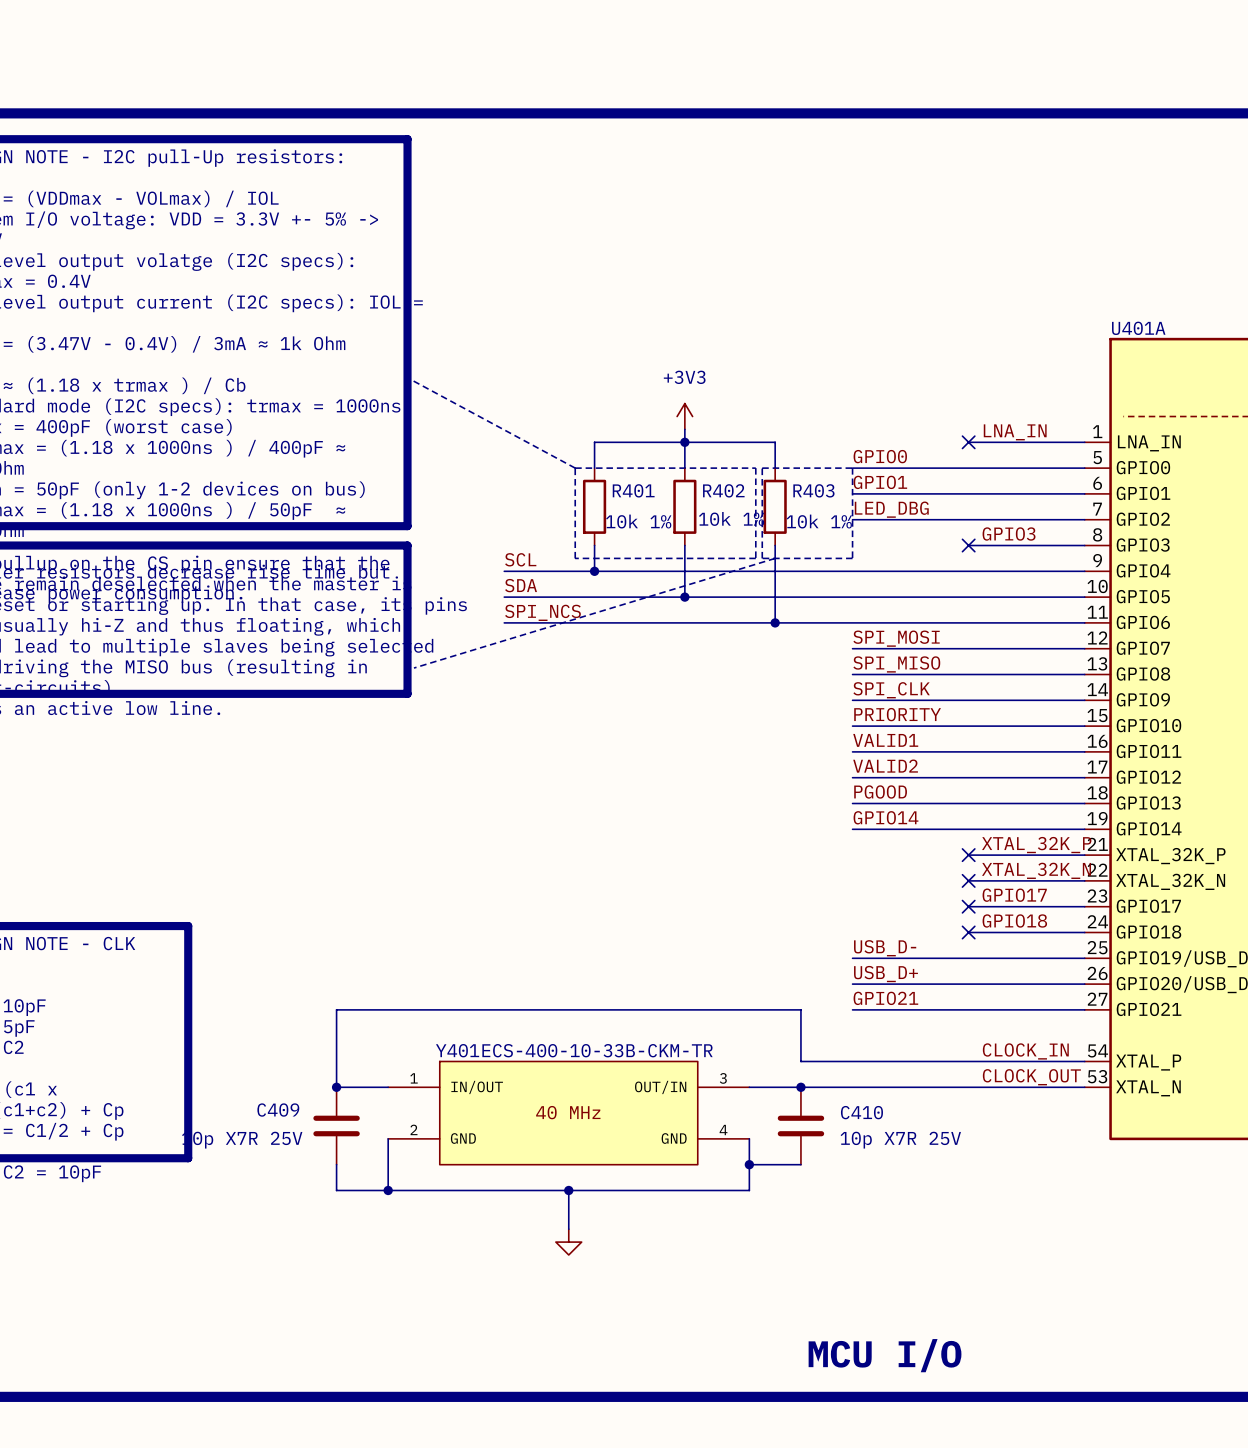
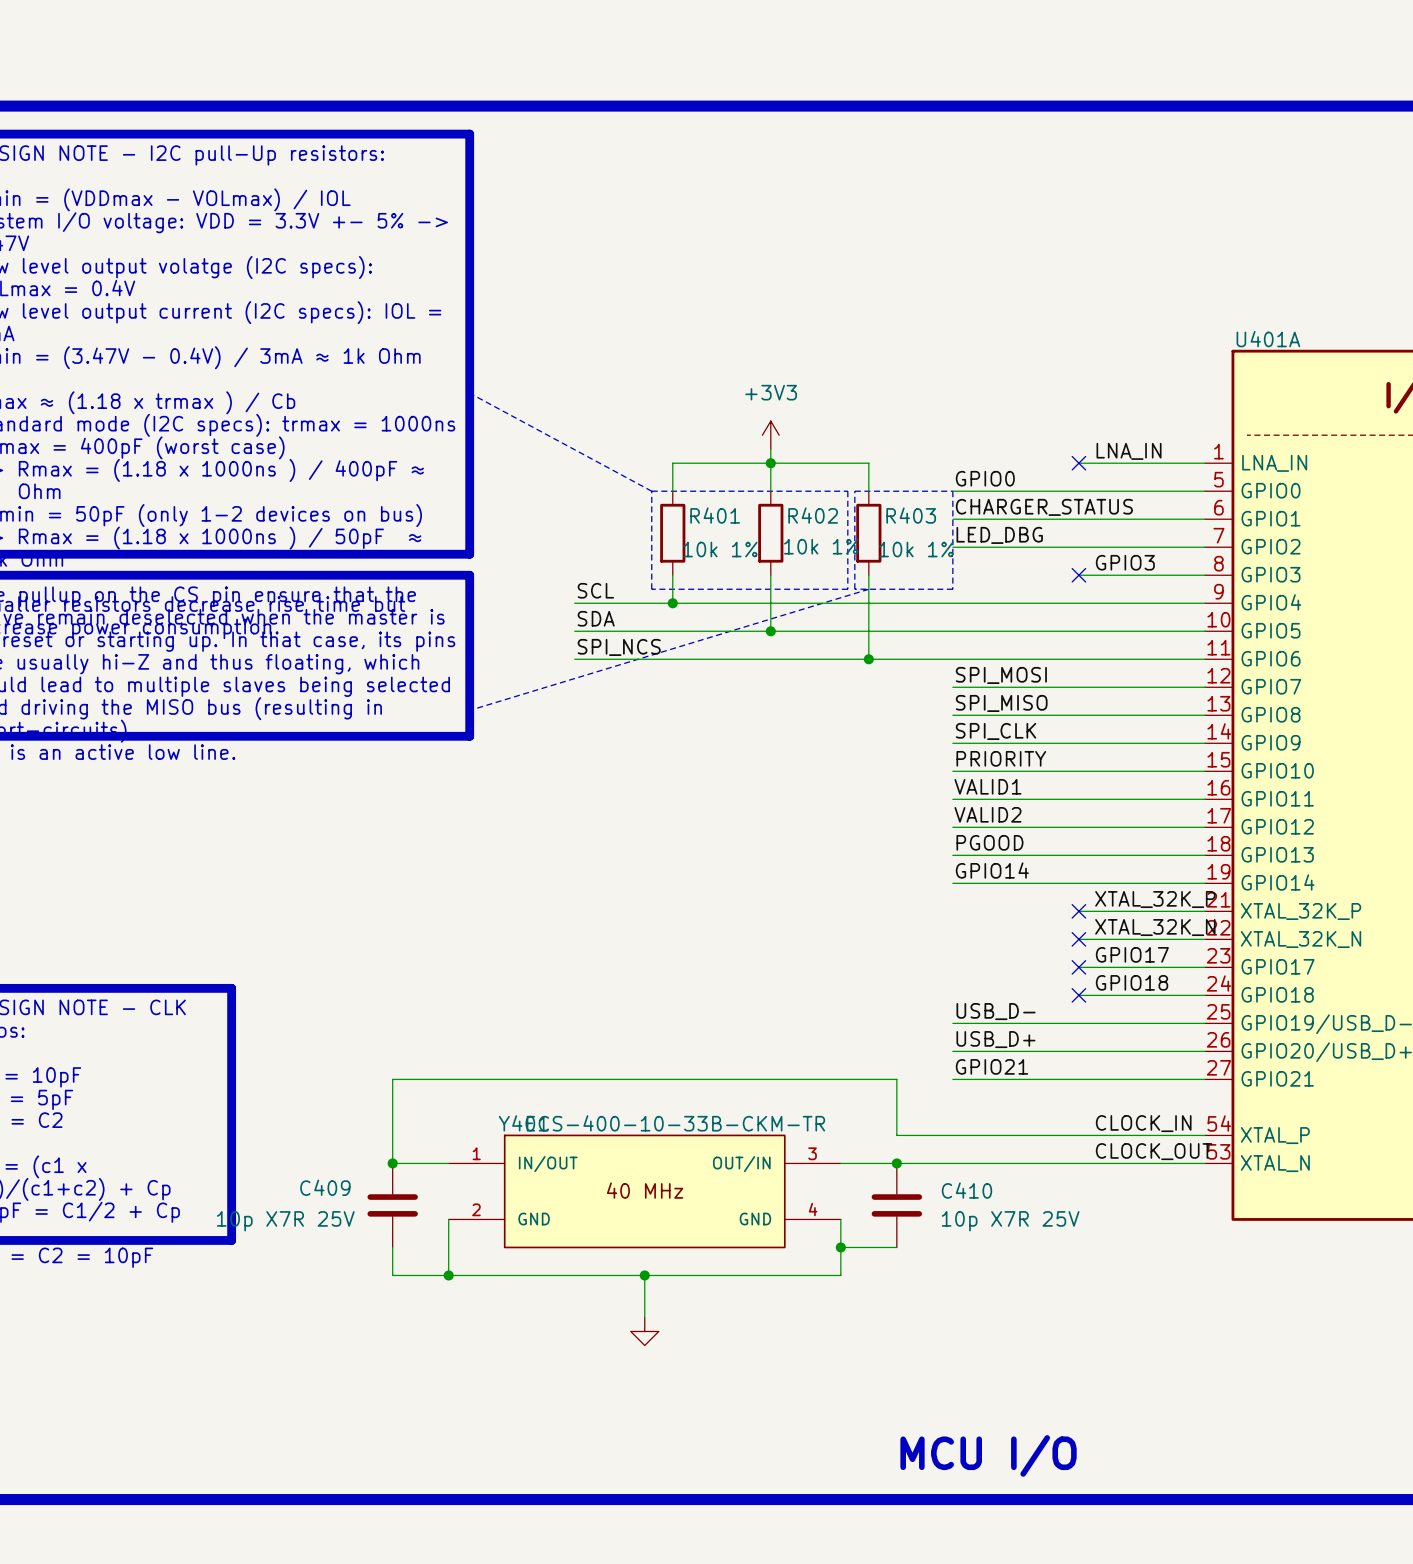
label: GPIO1 (880, 482) -> CHARGER_STATUS (1044, 507)

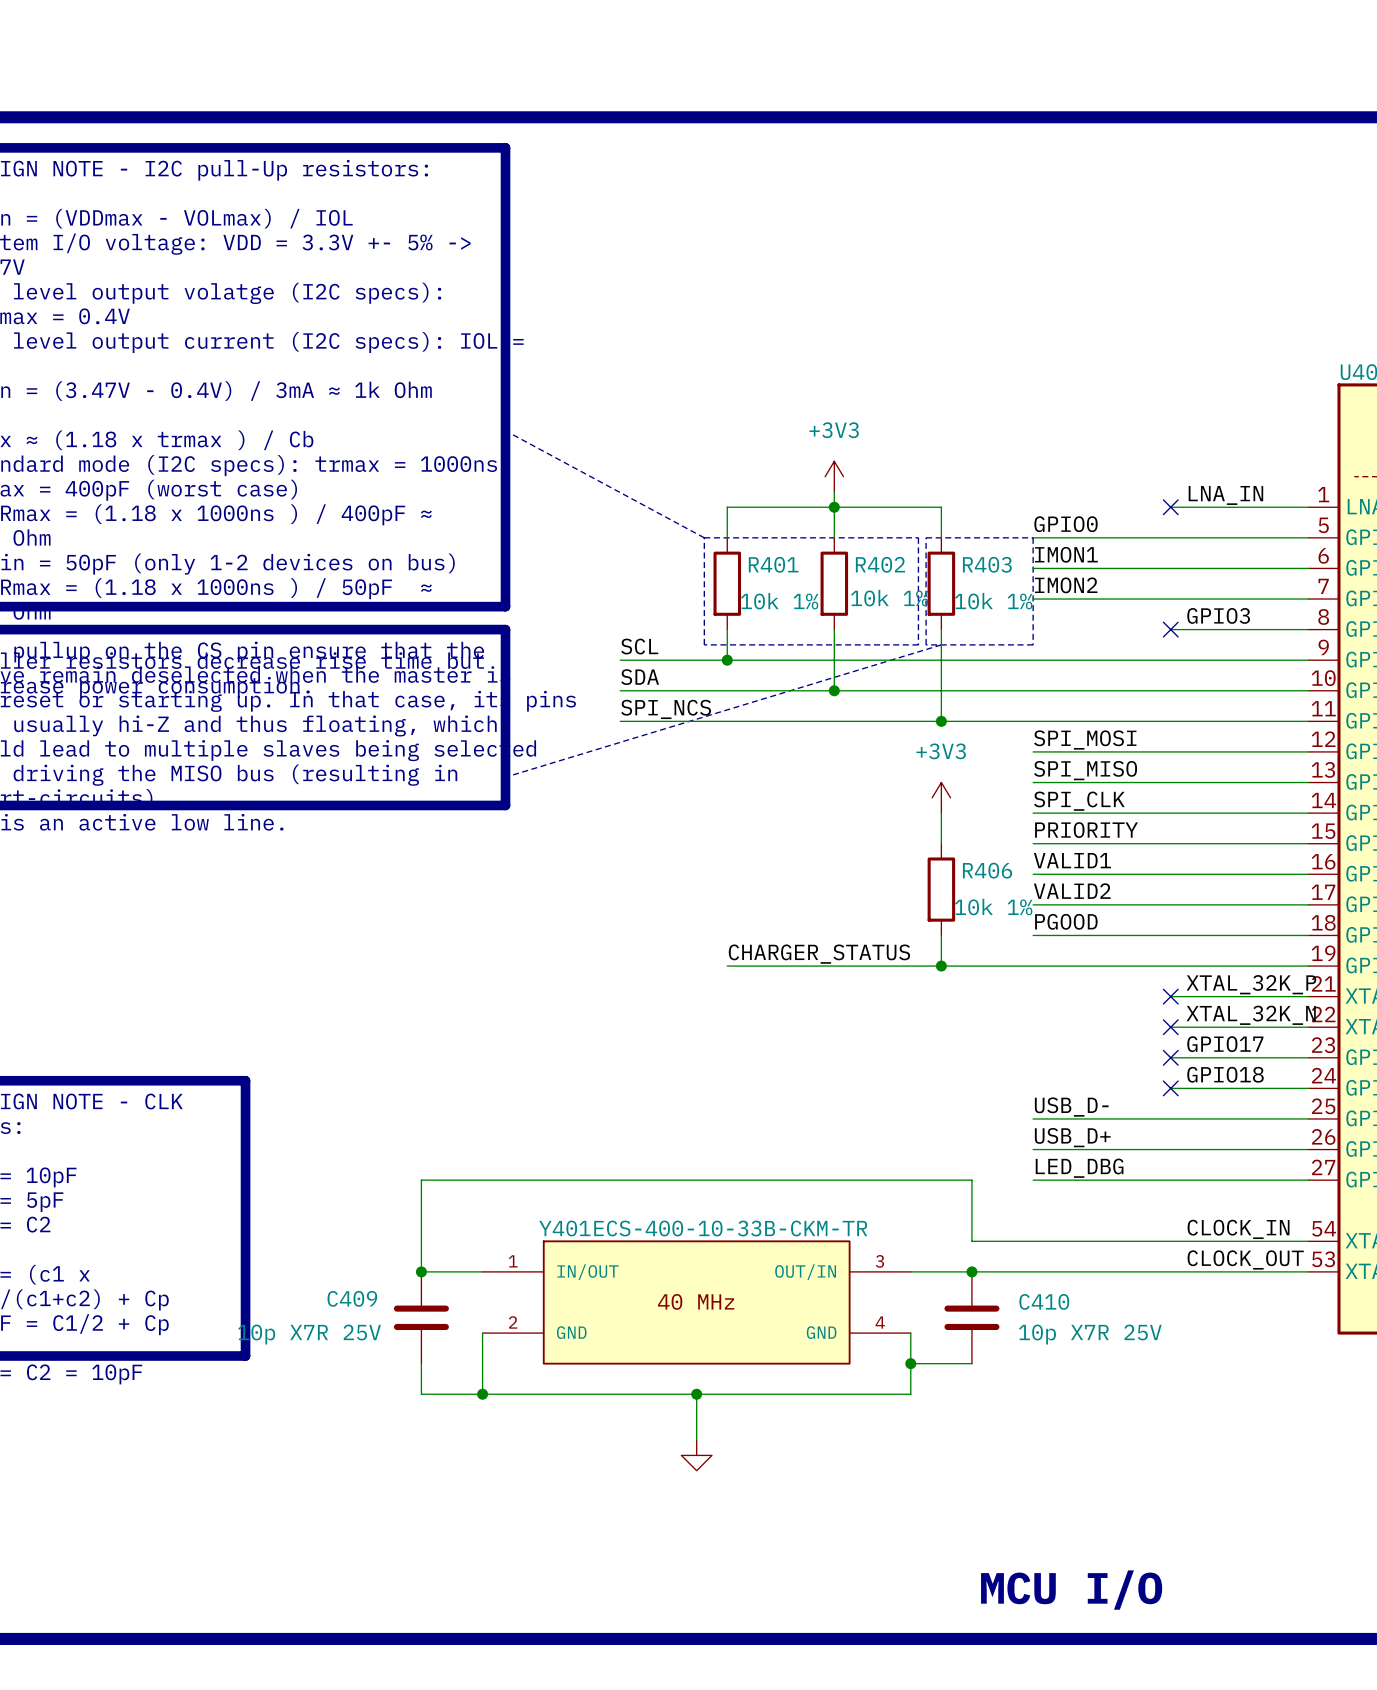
label: CHARGER_STATUS (1044, 507) -> IMON1 (1066, 554)
label: LED_DBG (999, 535) -> IMON2 (1066, 585)
power symbol: none -> +3V3 (941, 797)
wire: none -> (941, 813) (941, 843)
R406: none -> 10k 1% (941, 889)
wire: none -> (941, 935) (941, 966)
label: GPIO14 (992, 870) -> none
label: none -> CHARGER_STATUS (819, 954)
wire: none -> (727, 966) (1033, 966)
junction: none -> (941, 966)
label: GPIO21 (991, 1066) -> LED_DBG (1079, 1168)

